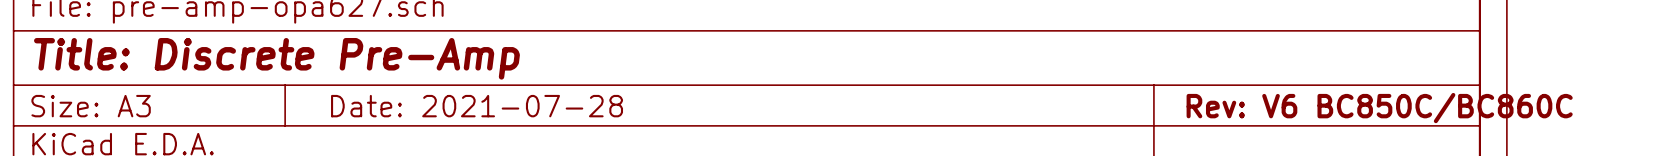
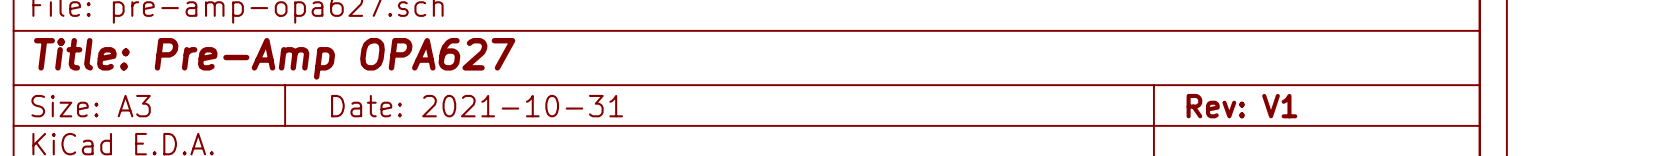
title block: Title: Discrete Pre-Amp (276, 58) -> Title: Pre-Amp OPA627 (274, 58)
title block: Date: 2021-07-28 (477, 106) -> Date: 2021-10-31 (477, 106)
title block: Rev: V6 BC850C/BC860C (1379, 108) -> Rev: V1 (1241, 106)

